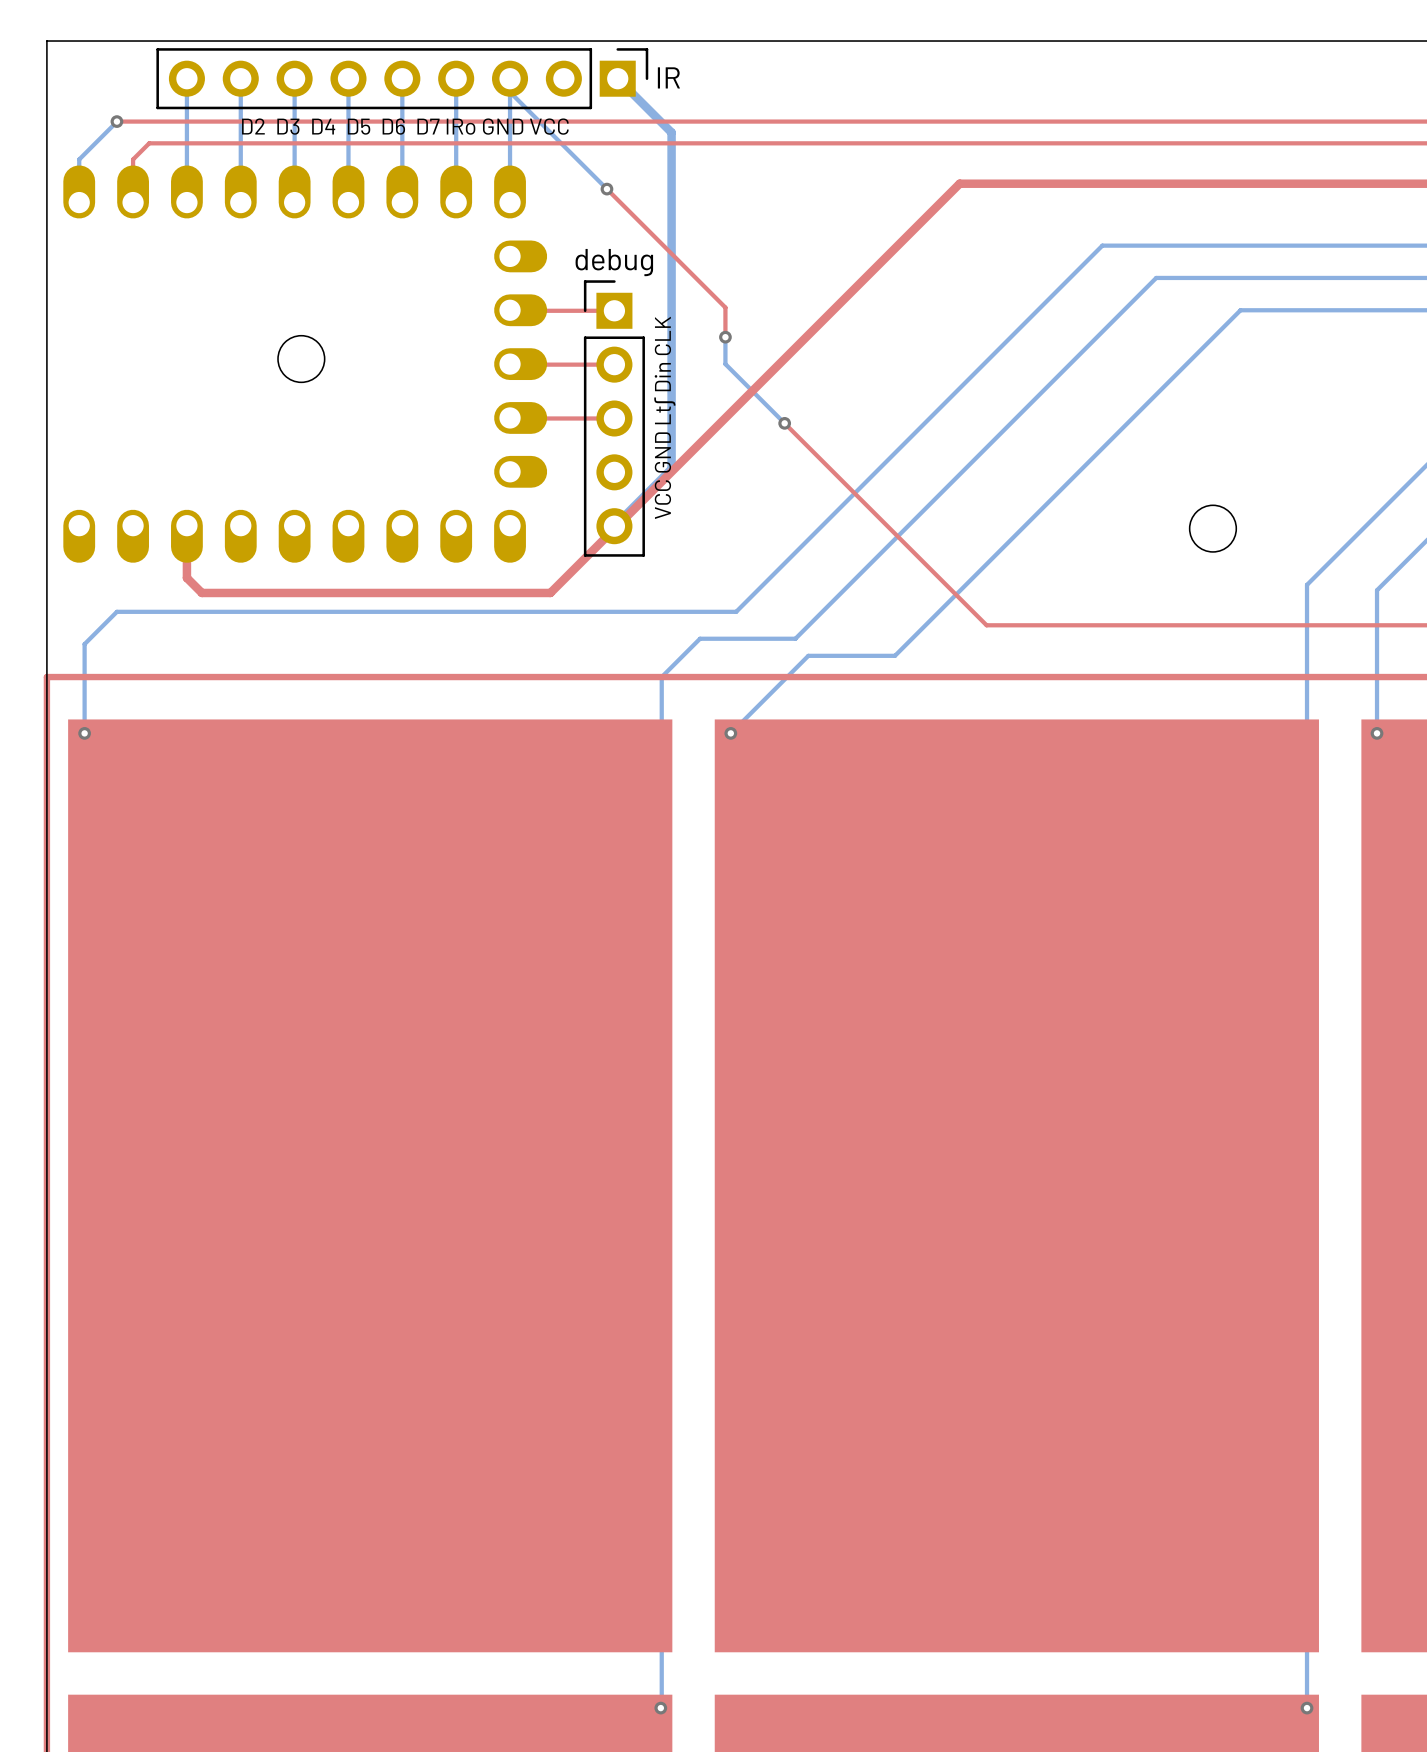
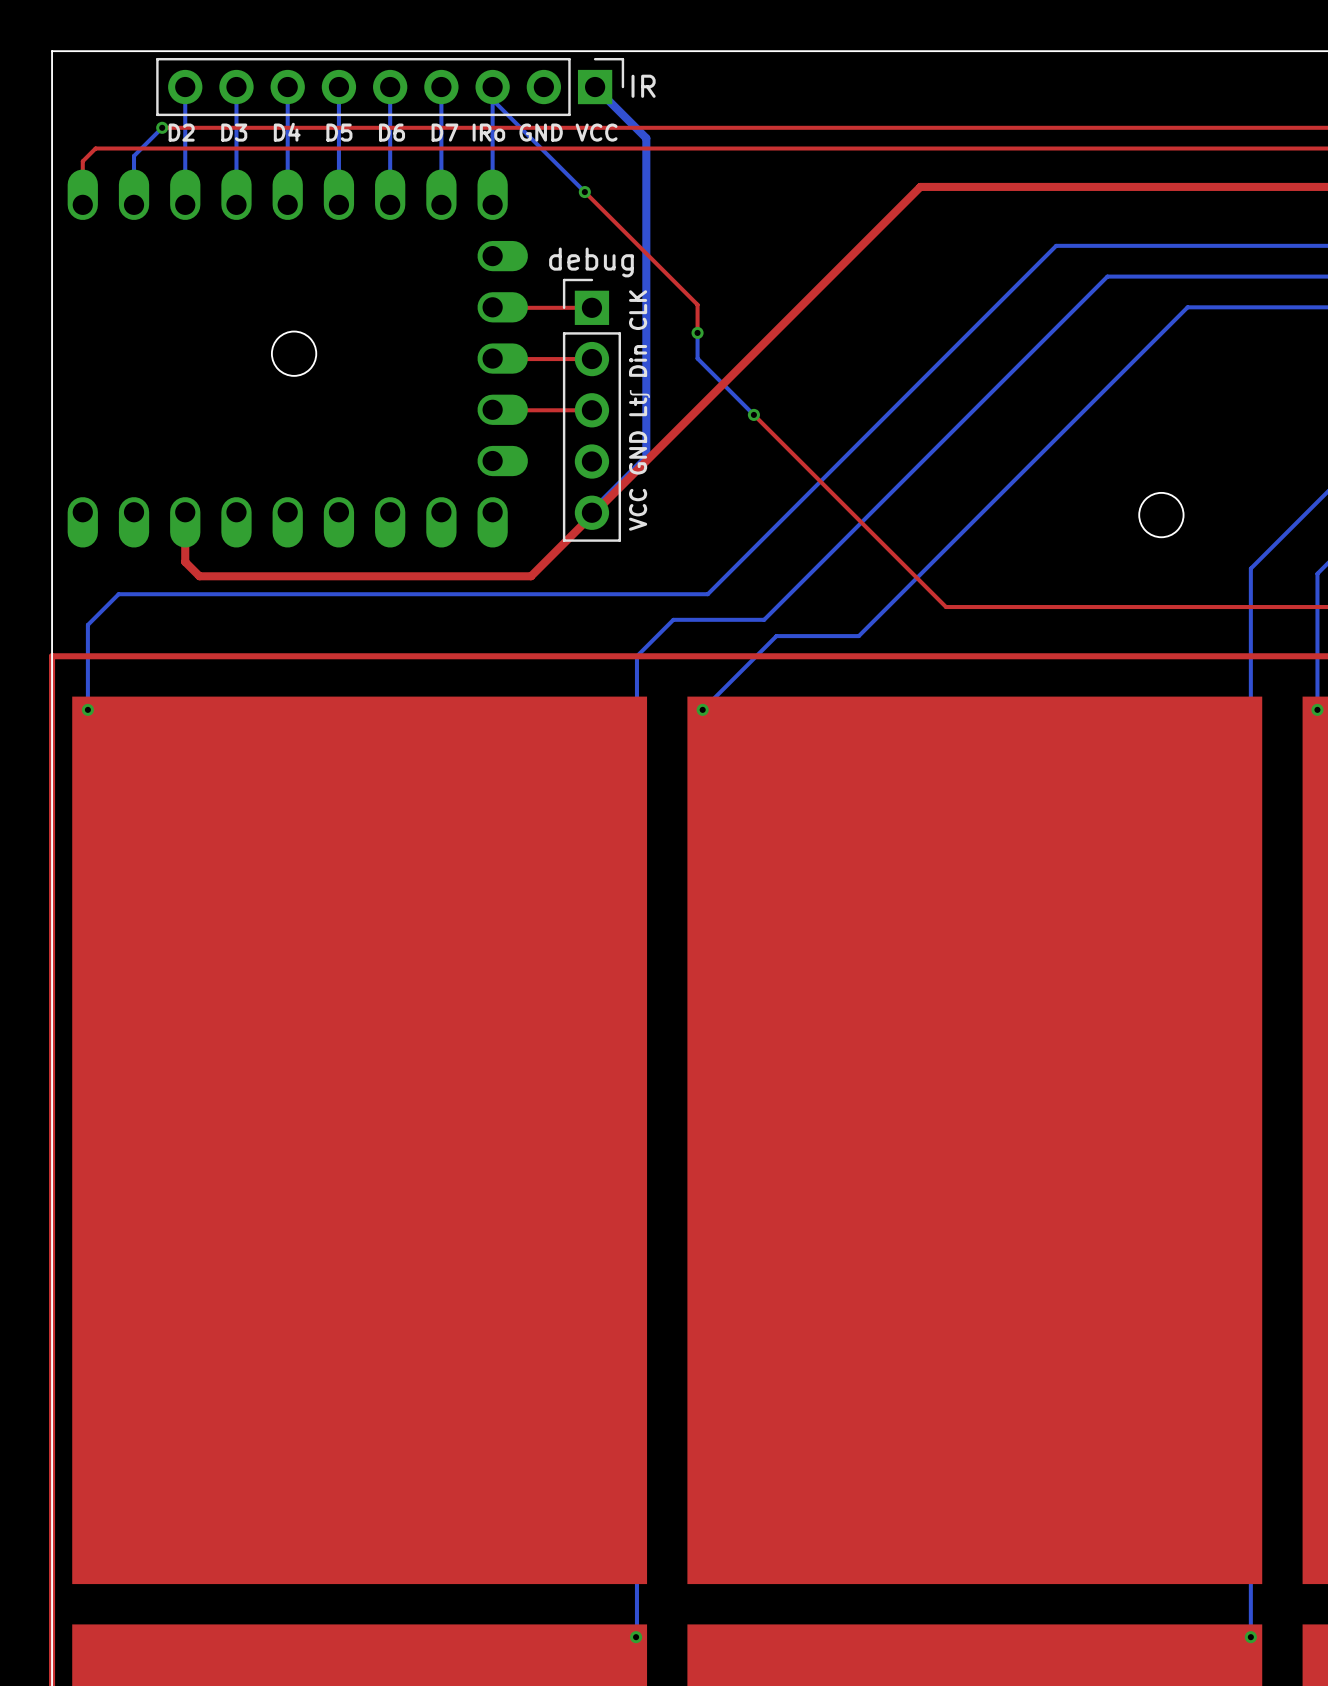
top track: (116, 121) (162, 121) -> none
bottom track: (116, 121) (79, 159) (79, 202) -> none
via position: (116, 121) -> (162, 127)
bottom track: none -> (162, 127) (134, 155) (134, 204)
top track: (149, 143) (133, 159) (133, 202) -> (149, 148) (95, 148) (82, 161) (82, 204)

